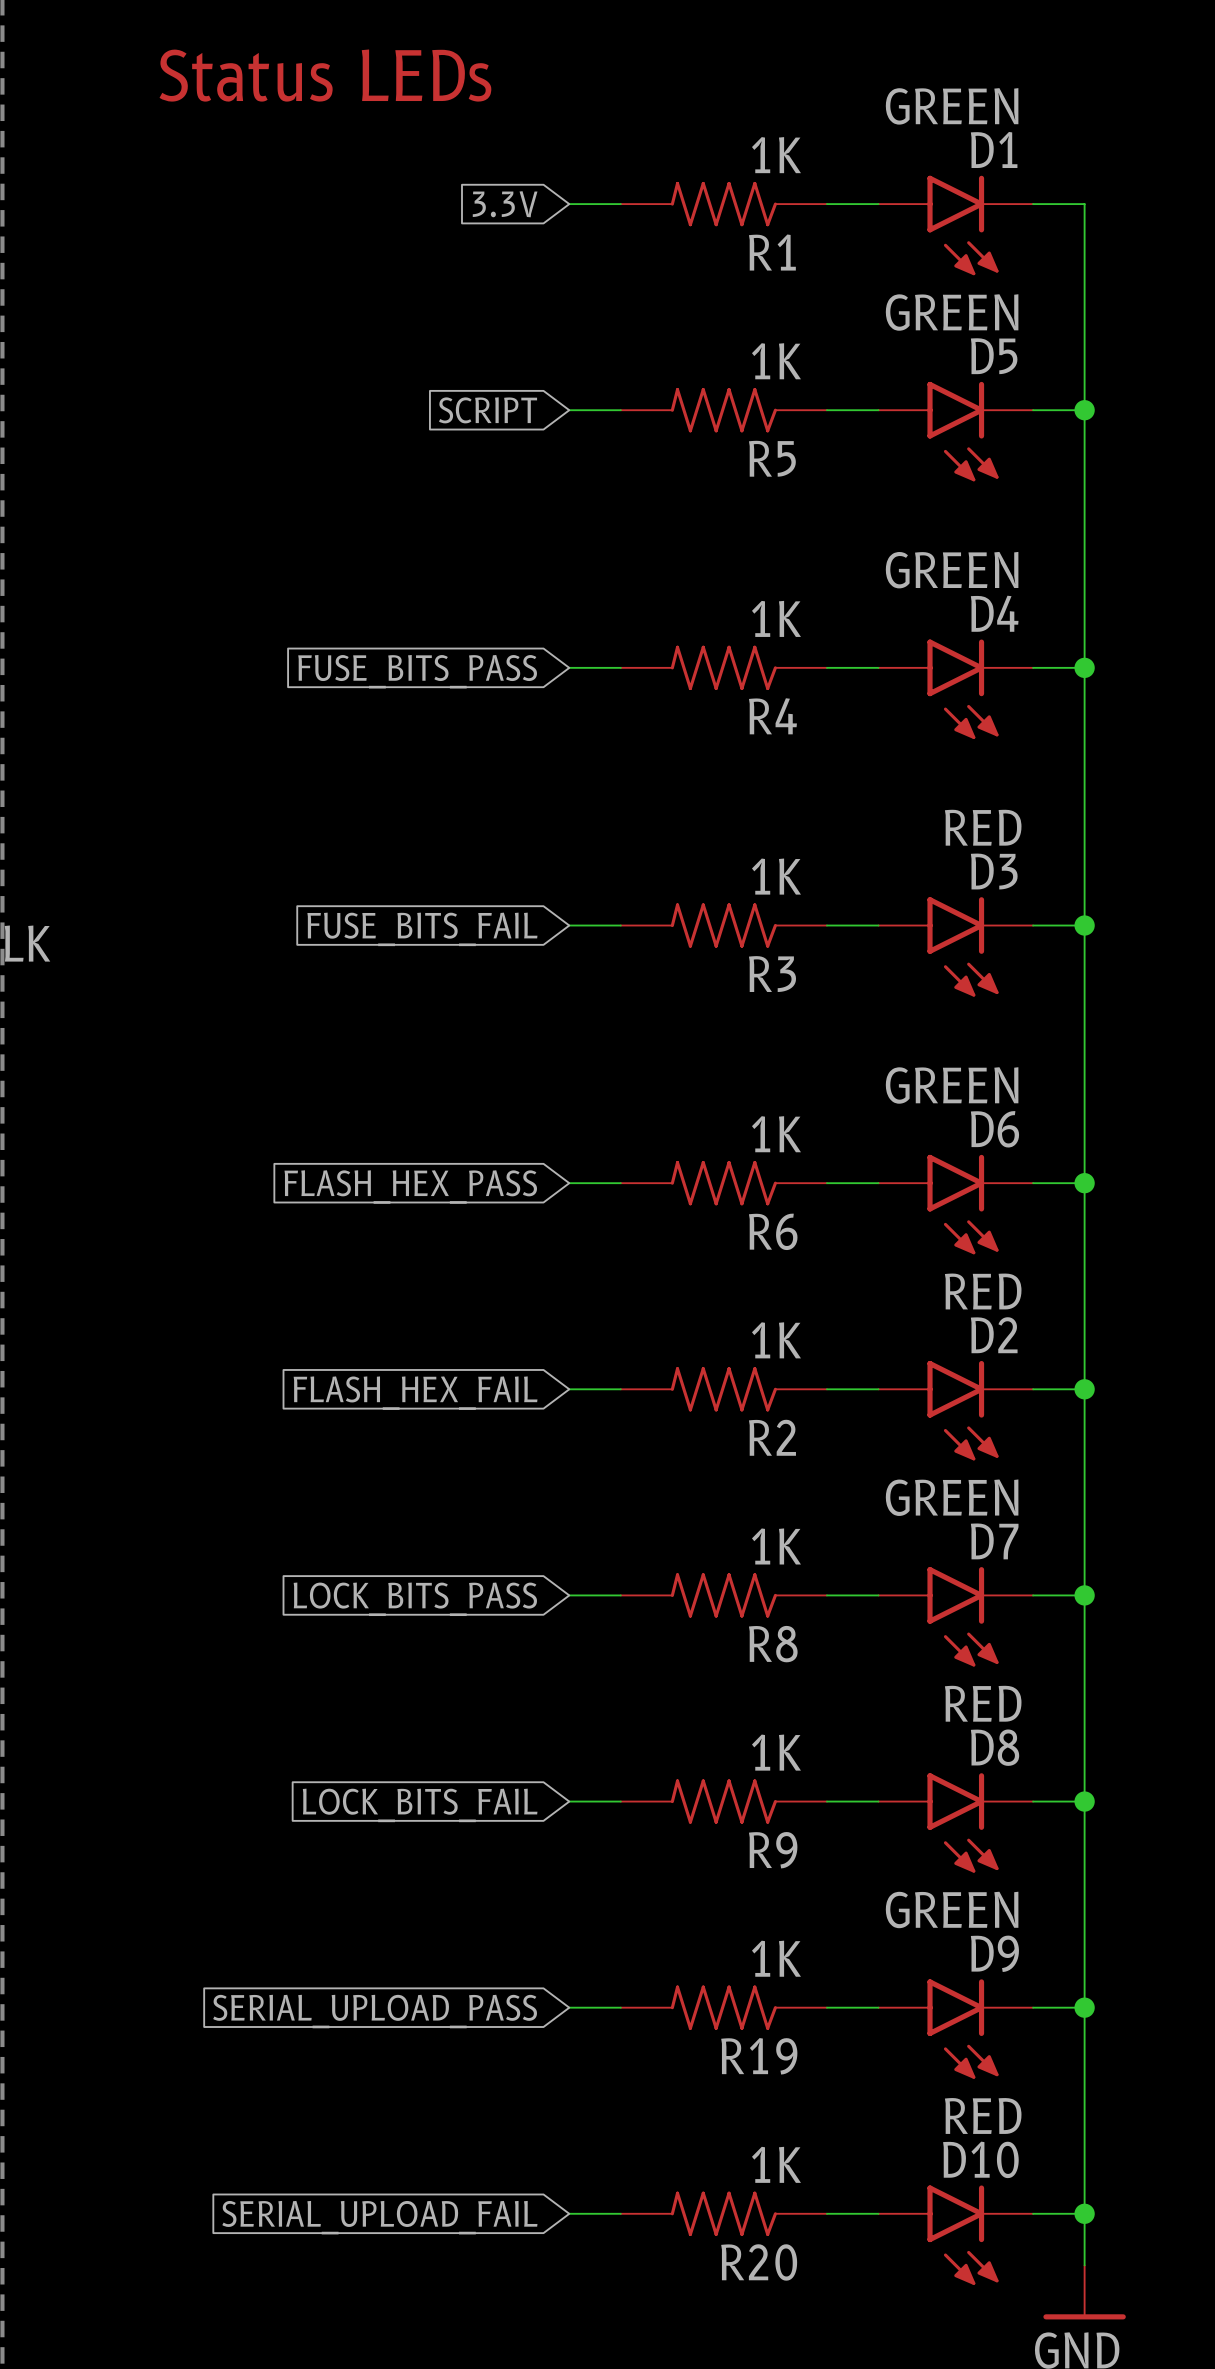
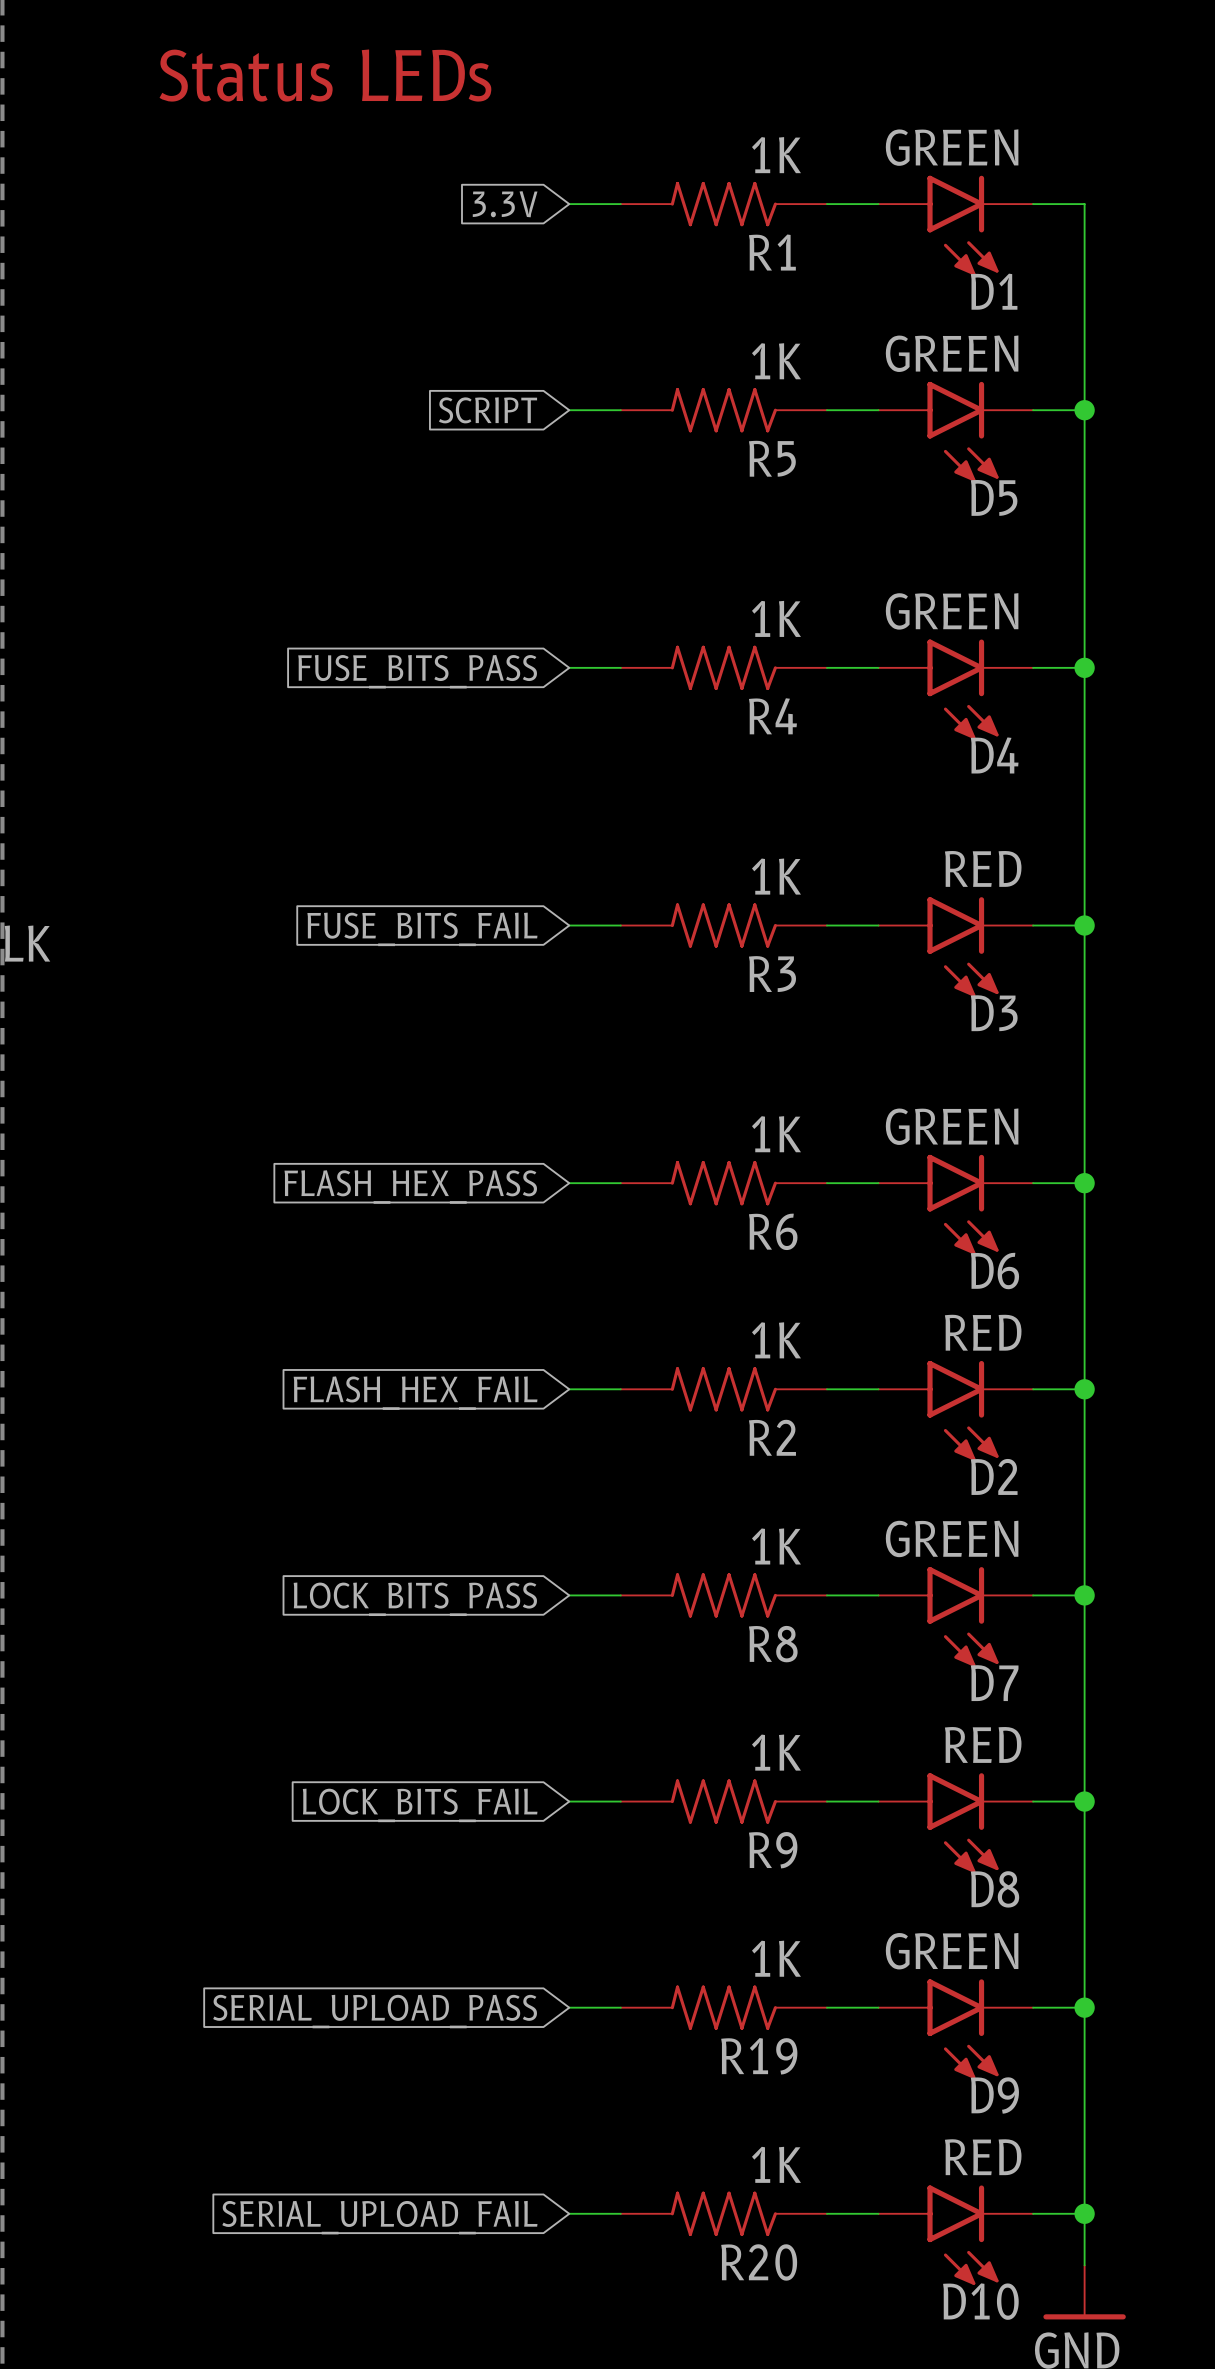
D1 value position: GREEN (952, 106) -> GREEN (952, 147)
D1 name position: D1 (994, 149) -> D1 (994, 291)
D5 value position: GREEN (952, 312) -> GREEN (952, 353)
D5 name position: D5 (994, 356) -> D5 (994, 497)
D4 value position: GREEN (952, 570) -> GREEN (952, 611)
D4 name position: D4 (994, 613) -> D4 (994, 755)
D3 value position: RED (983, 827) -> RED (983, 868)
D3 name position: D3 (994, 871) -> D3 (994, 1013)
D6 value position: GREEN (952, 1085) -> GREEN (952, 1126)
D6 name position: D6 (994, 1129) -> D6 (994, 1271)
D2 value position: RED (983, 1291) -> RED (983, 1332)
D2 name position: D2 (994, 1335) -> D2 (994, 1476)
D7 value position: GREEN (952, 1497) -> GREEN (952, 1538)
D7 name position: D7 (994, 1541) -> D7 (994, 1683)
D8 value position: RED (983, 1703) -> RED (983, 1744)
D8 name position: D8 (995, 1747) -> D8 (995, 1889)
D9 value position: GREEN (952, 1909) -> GREEN (952, 1951)
D9 name position: D9 (994, 1953) -> D9 (994, 2095)
D10 value position: RED (983, 2115) -> RED (983, 2157)
D10 name position: D10 (980, 2159) -> D10 (980, 2301)

